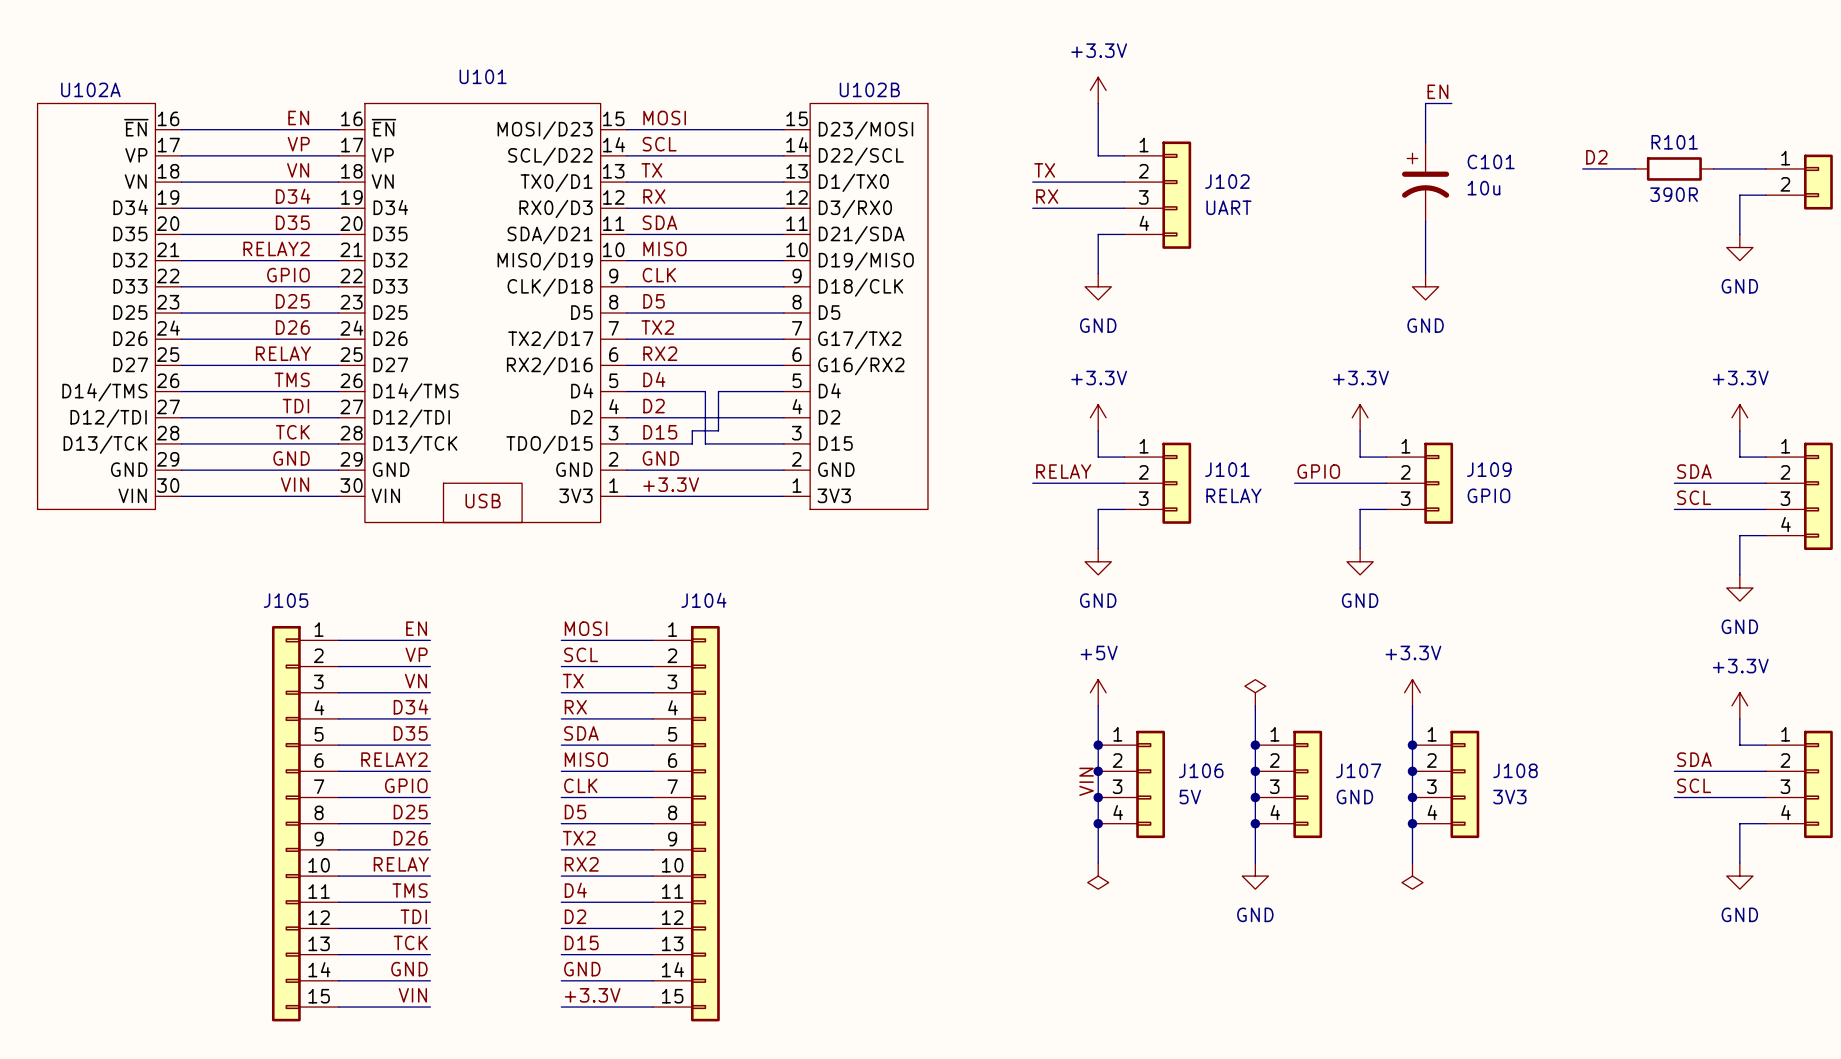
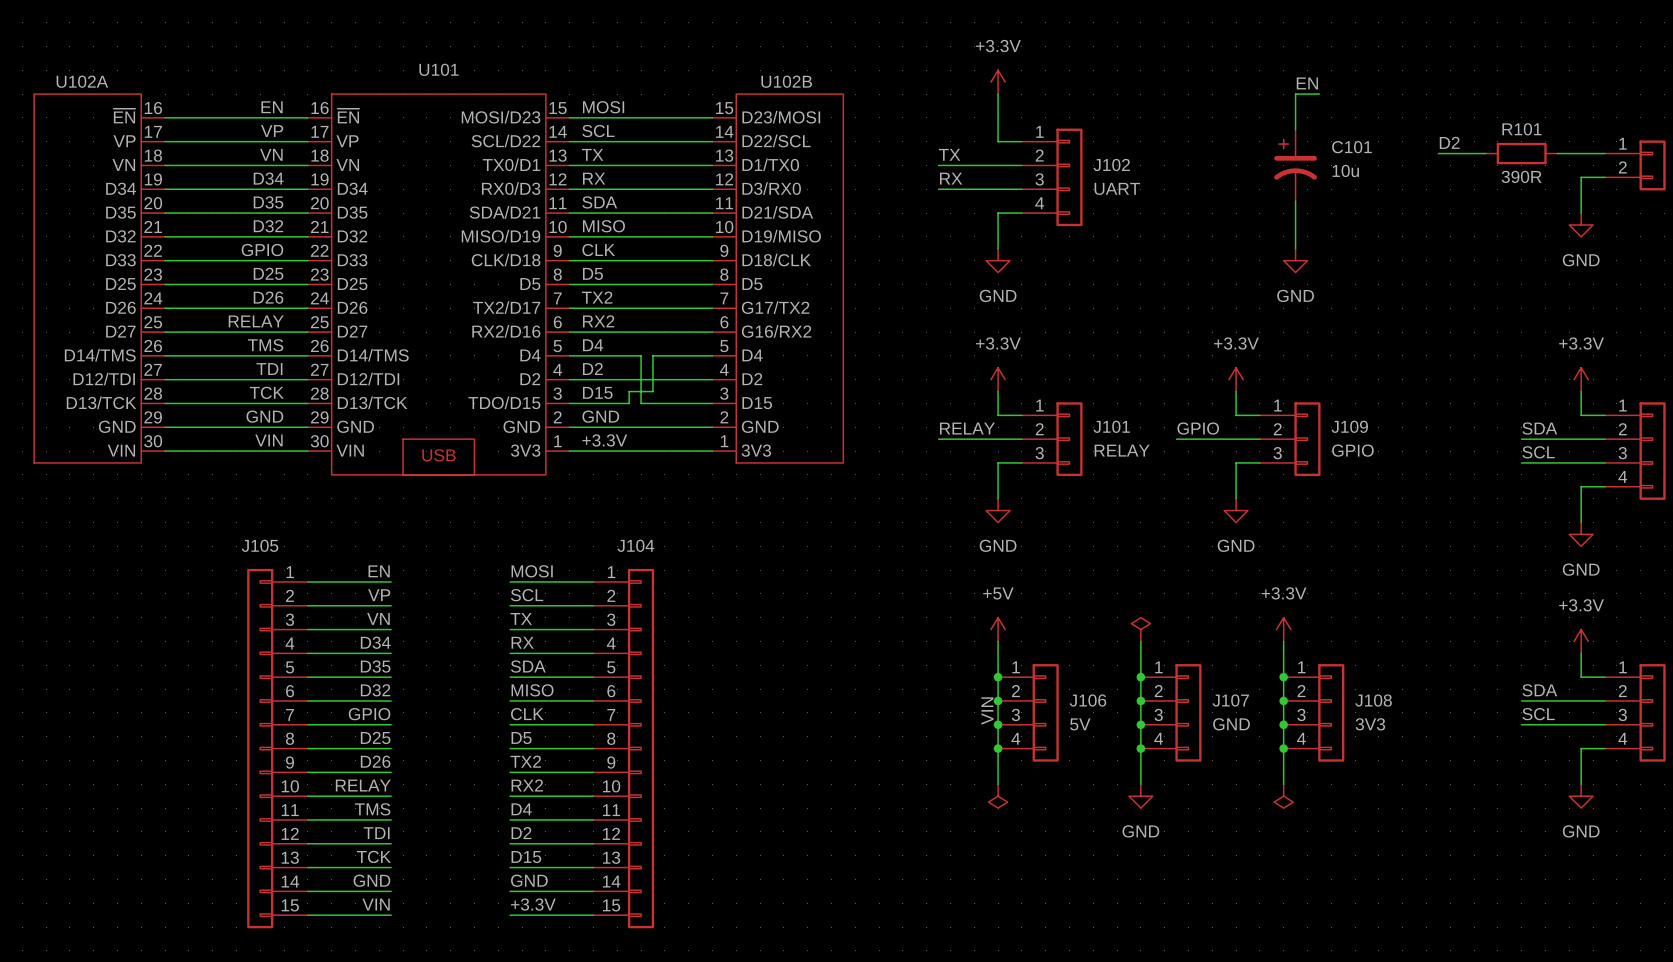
label: RELAY2 (276, 248) -> D32 (268, 226)
label: RELAY2 (394, 759) -> D32 (375, 690)

